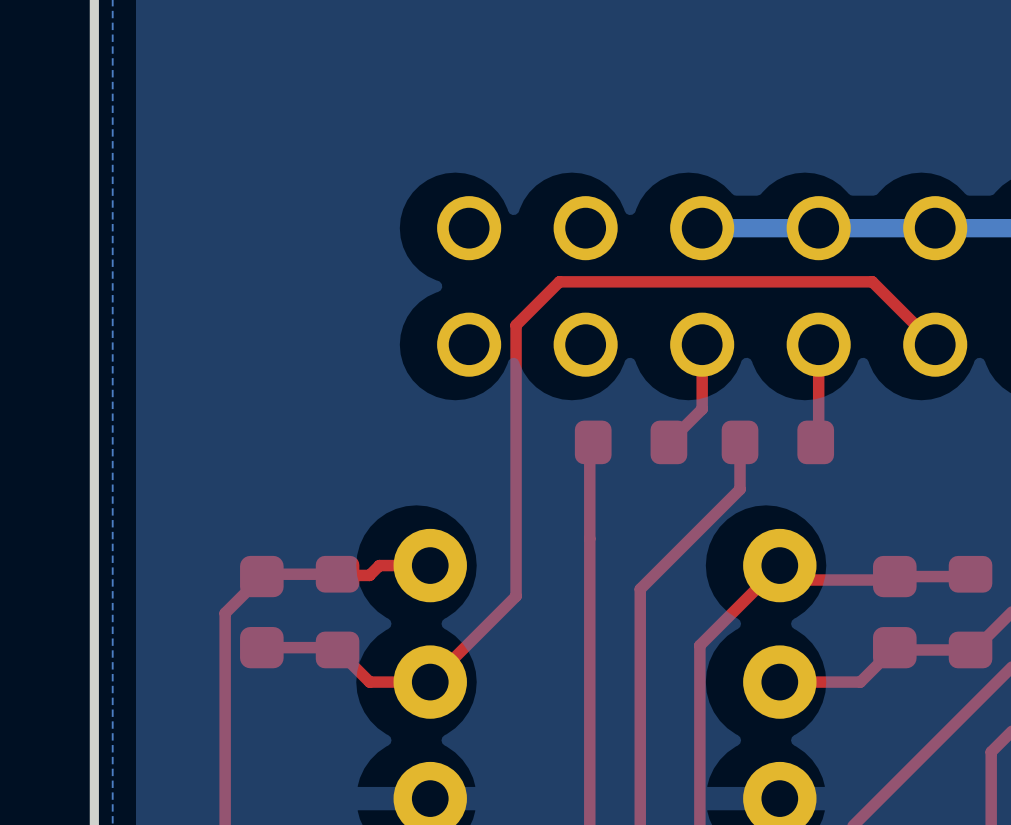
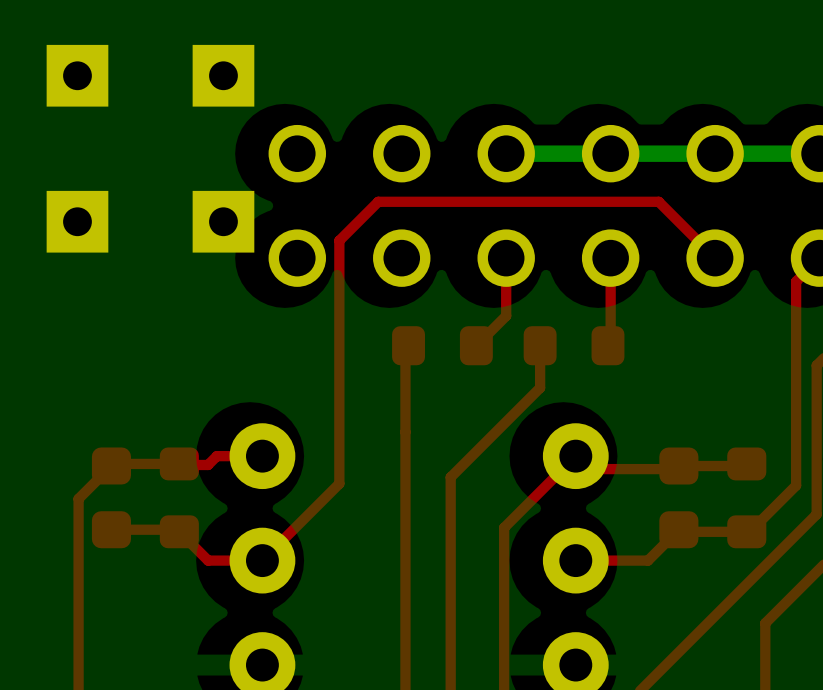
part: none -> (77, 75)
part: none -> (223, 75)
part: none -> (77, 221)
part: none -> (223, 221)

